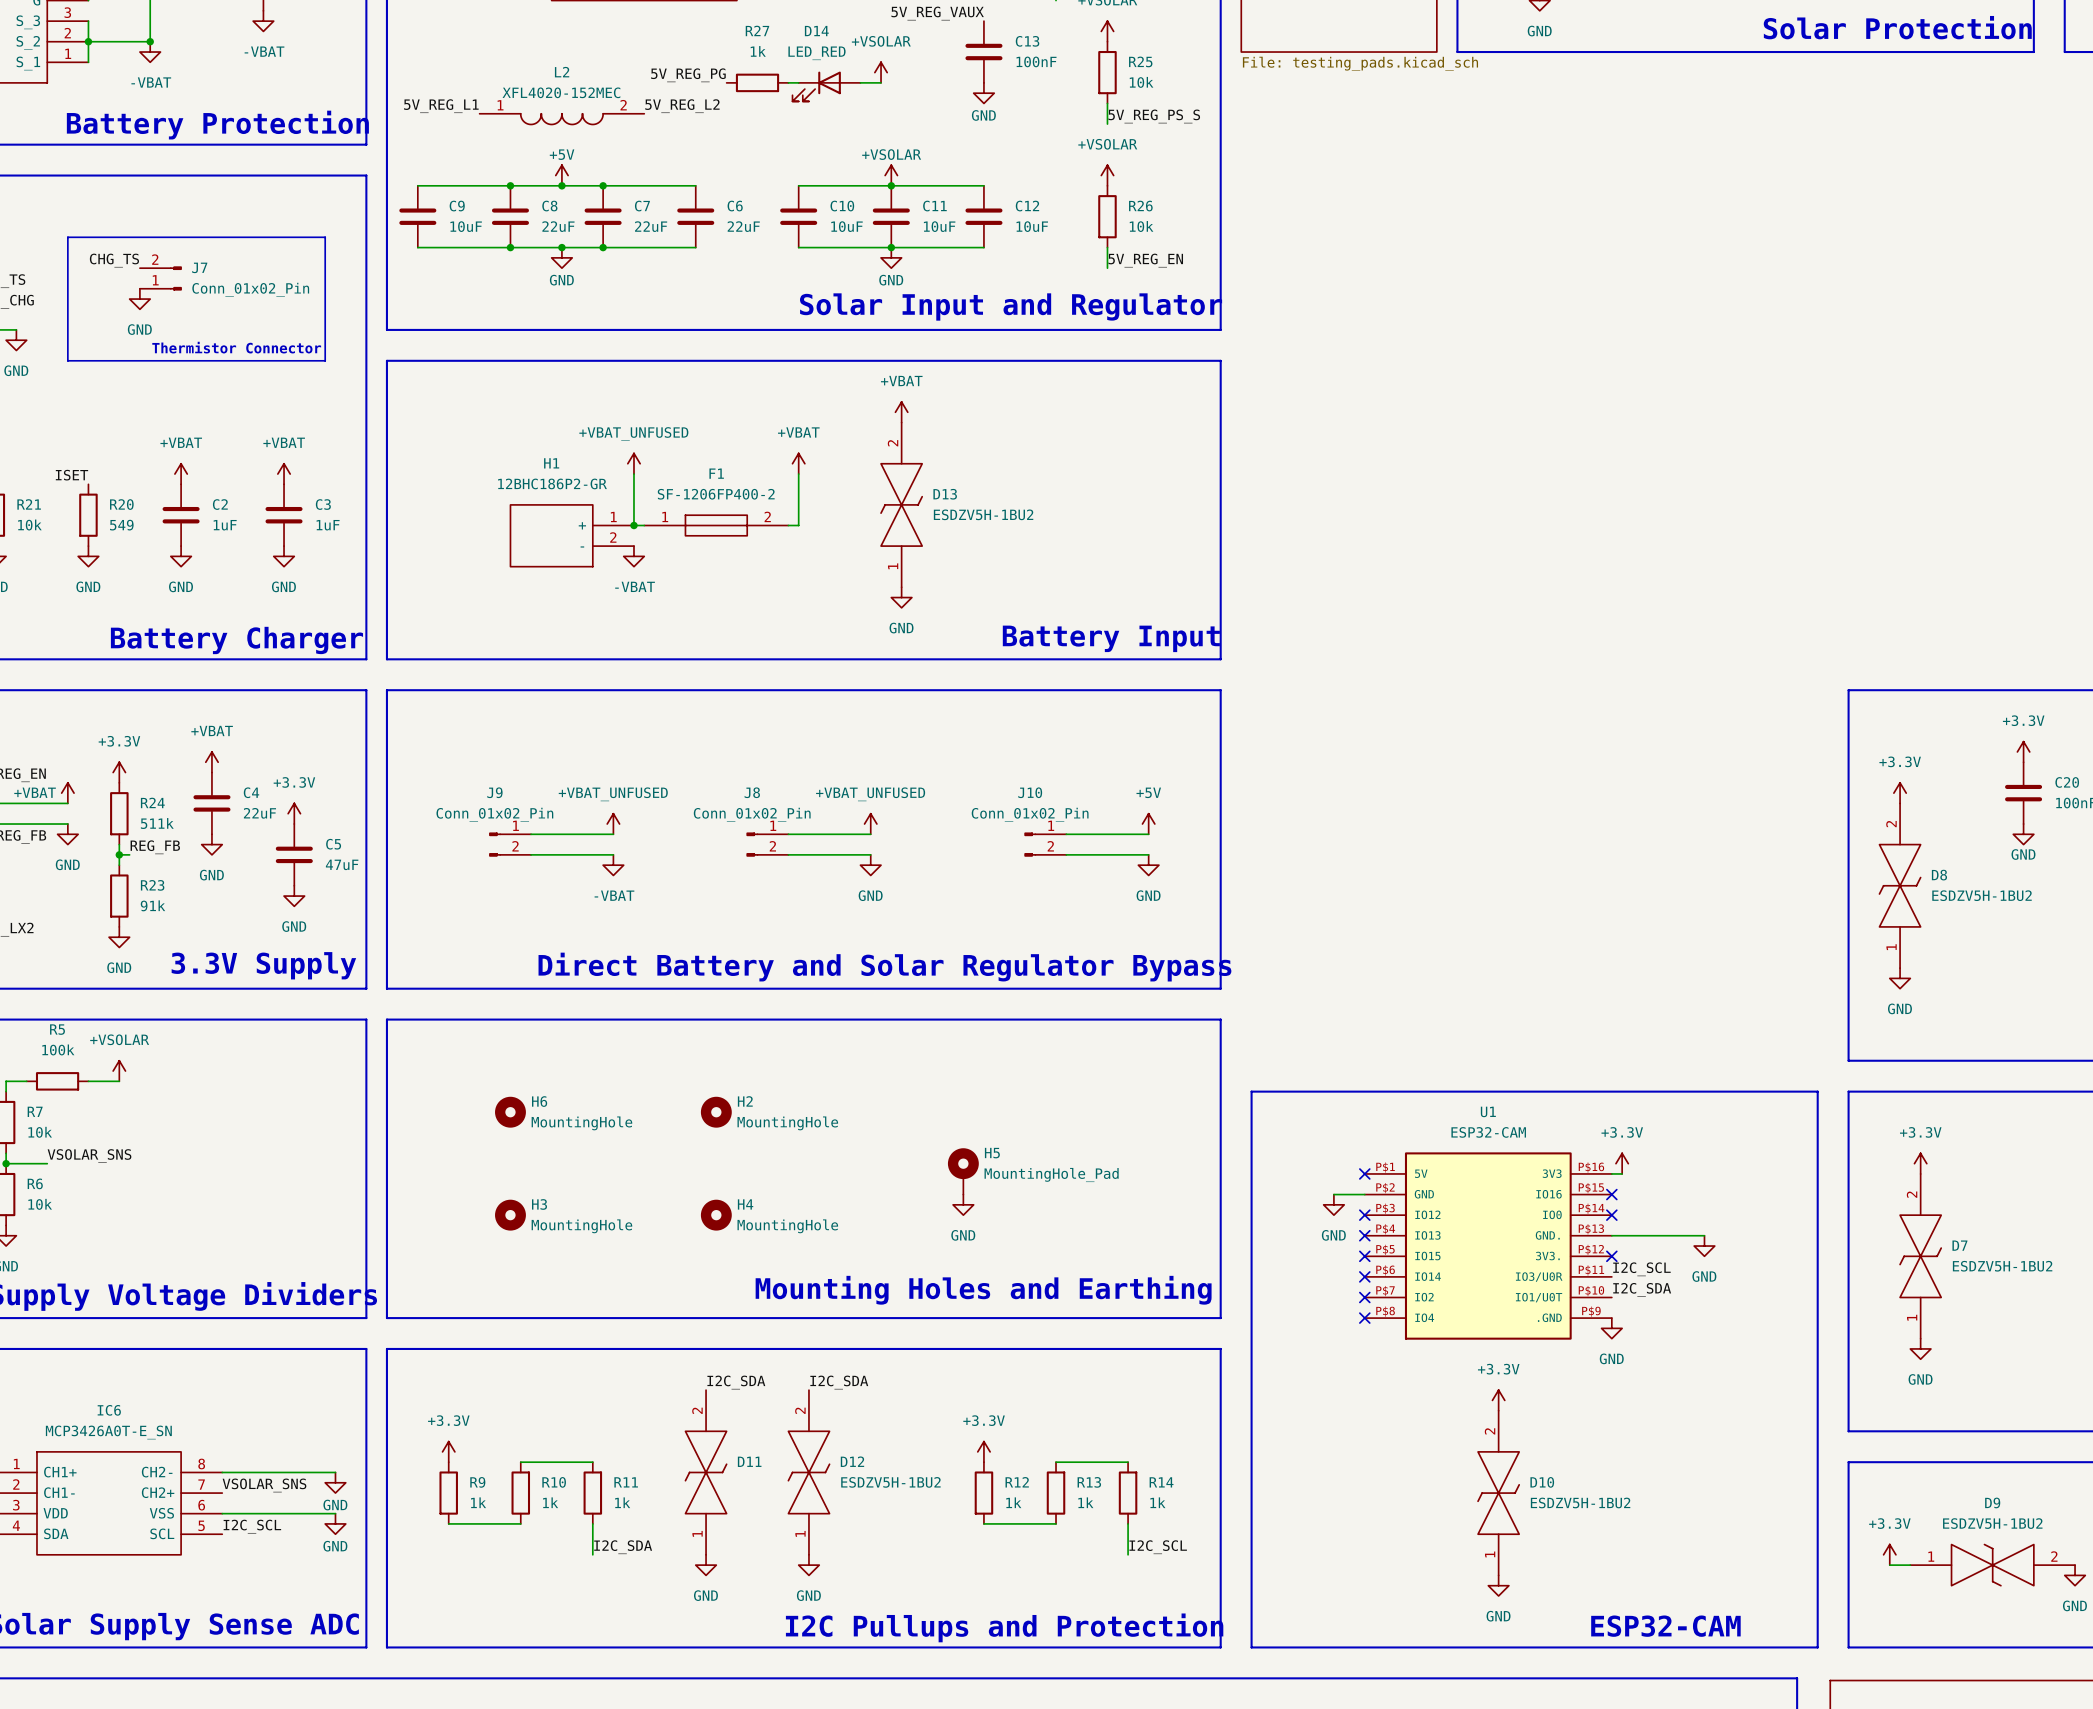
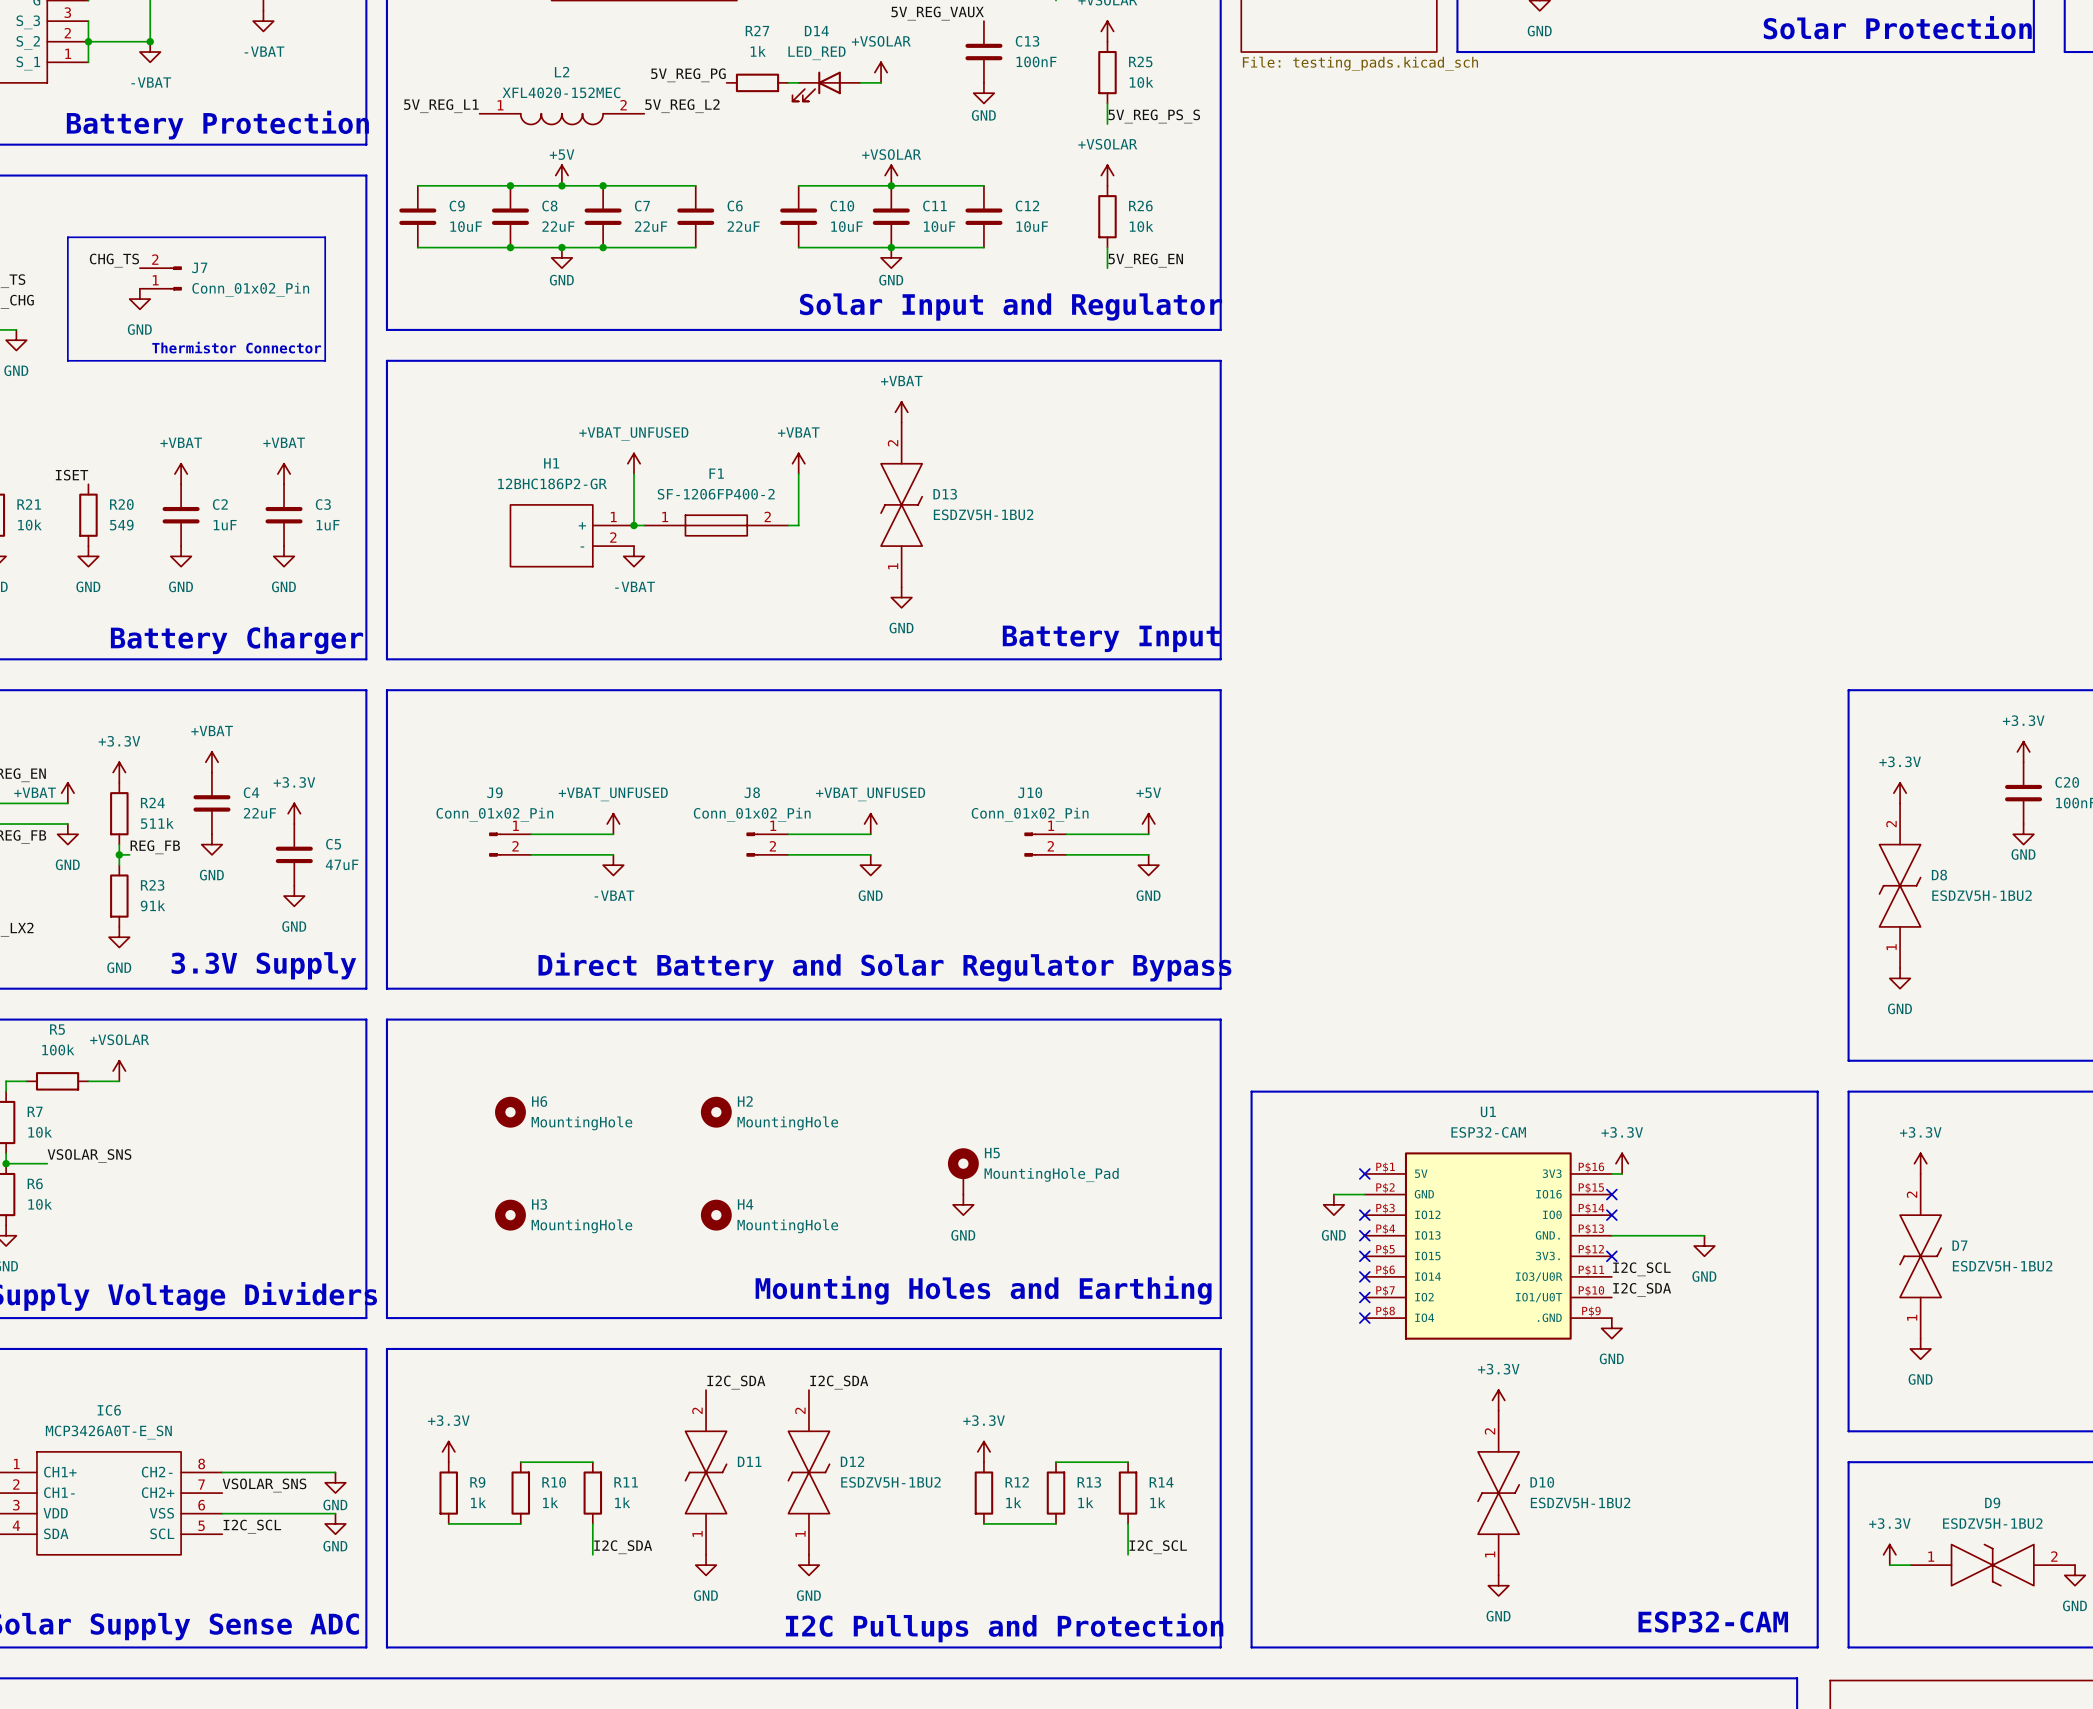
text position: ESP32-CAM (1665, 1626) -> ESP32-CAM (1713, 1622)

